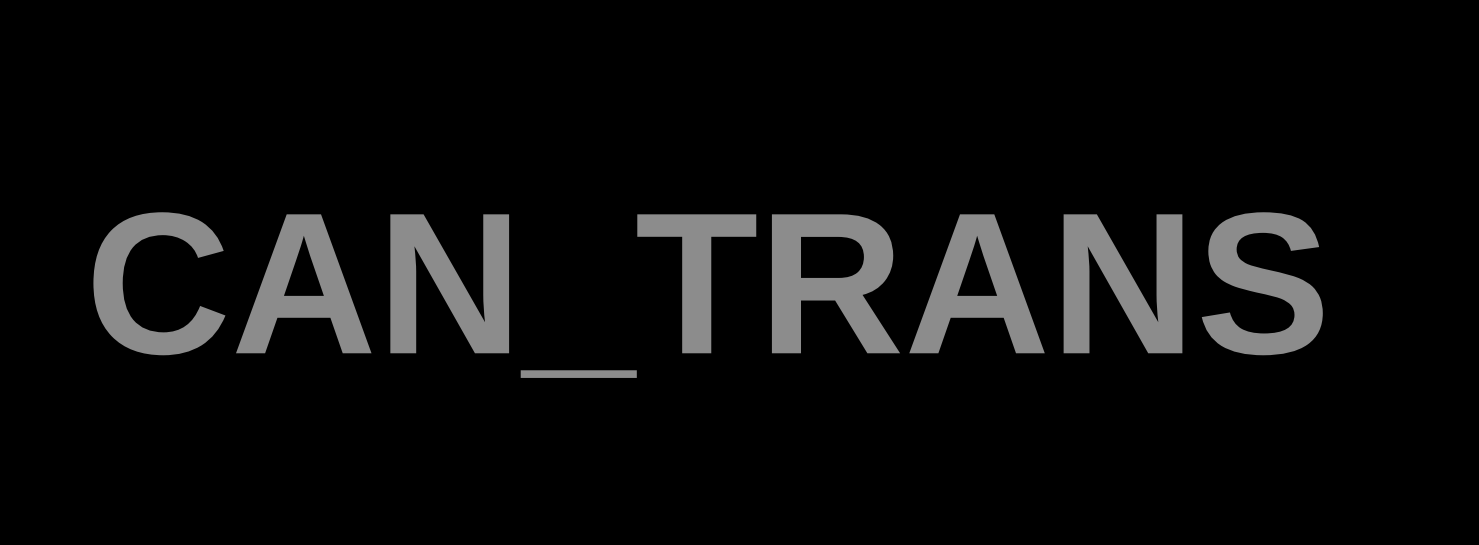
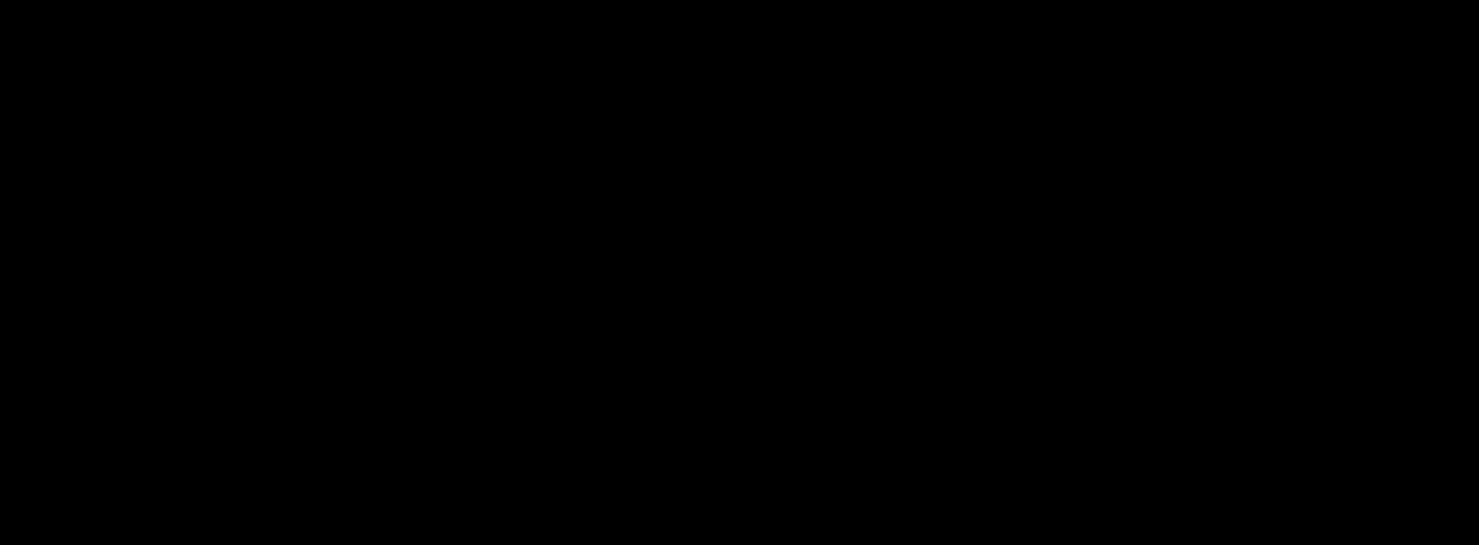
text: CAN_TRANS (708, 295) -> none

